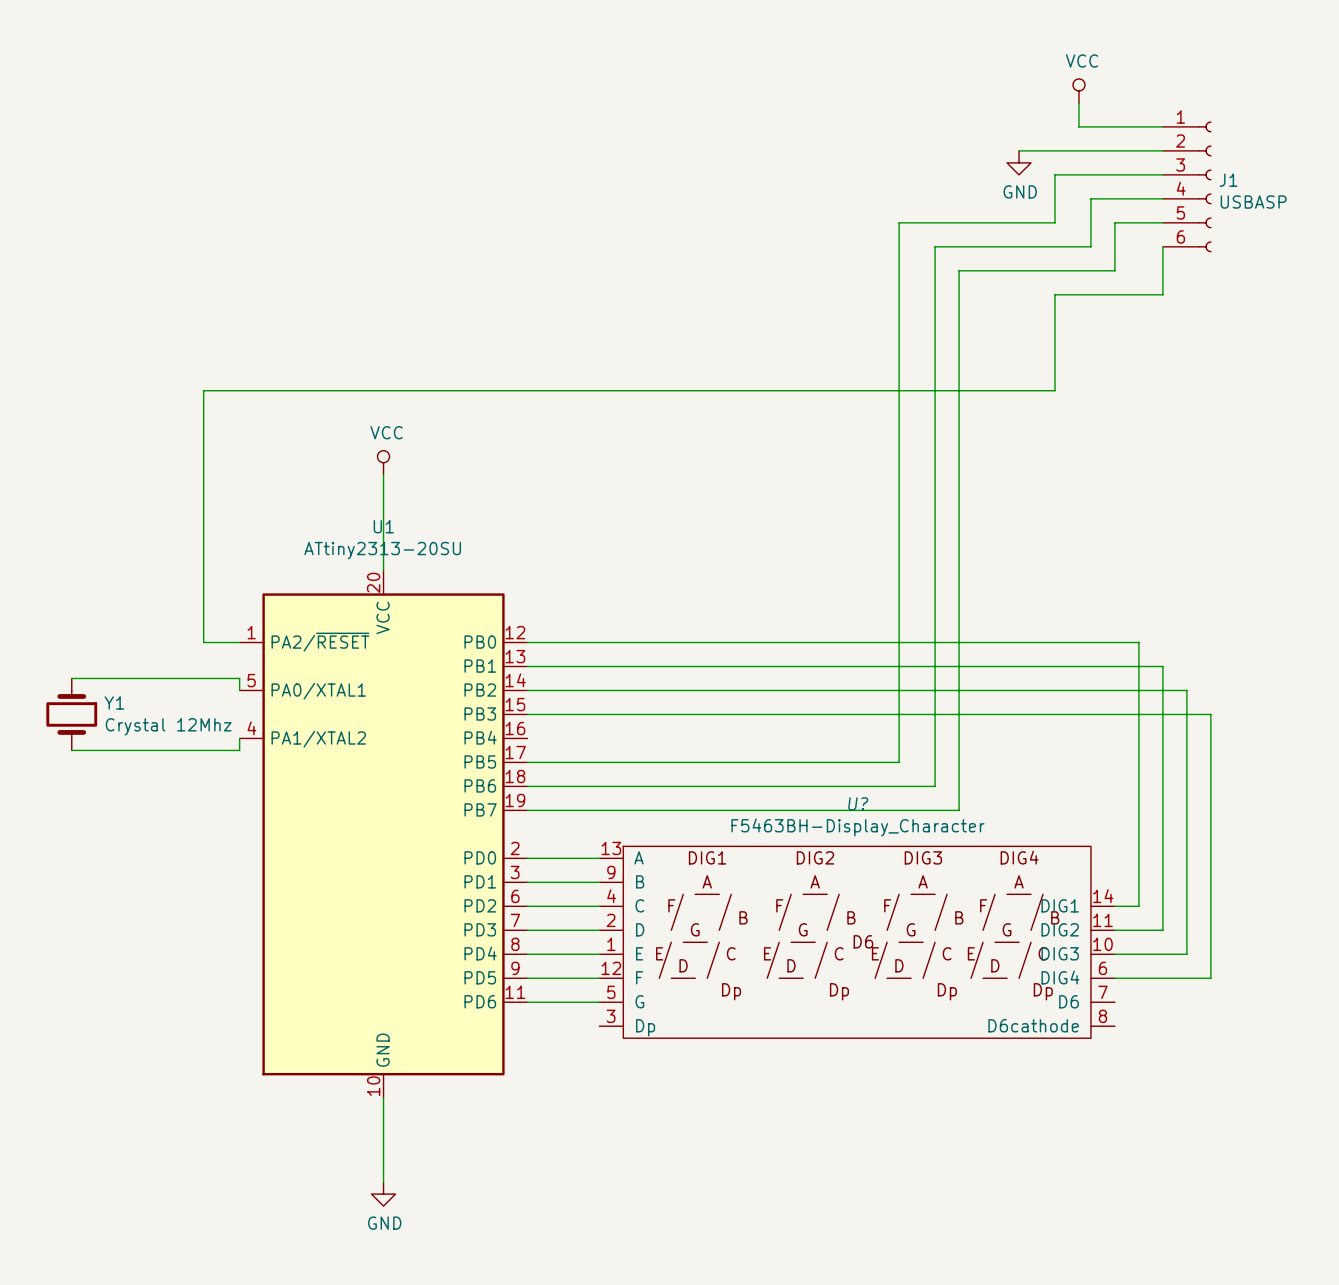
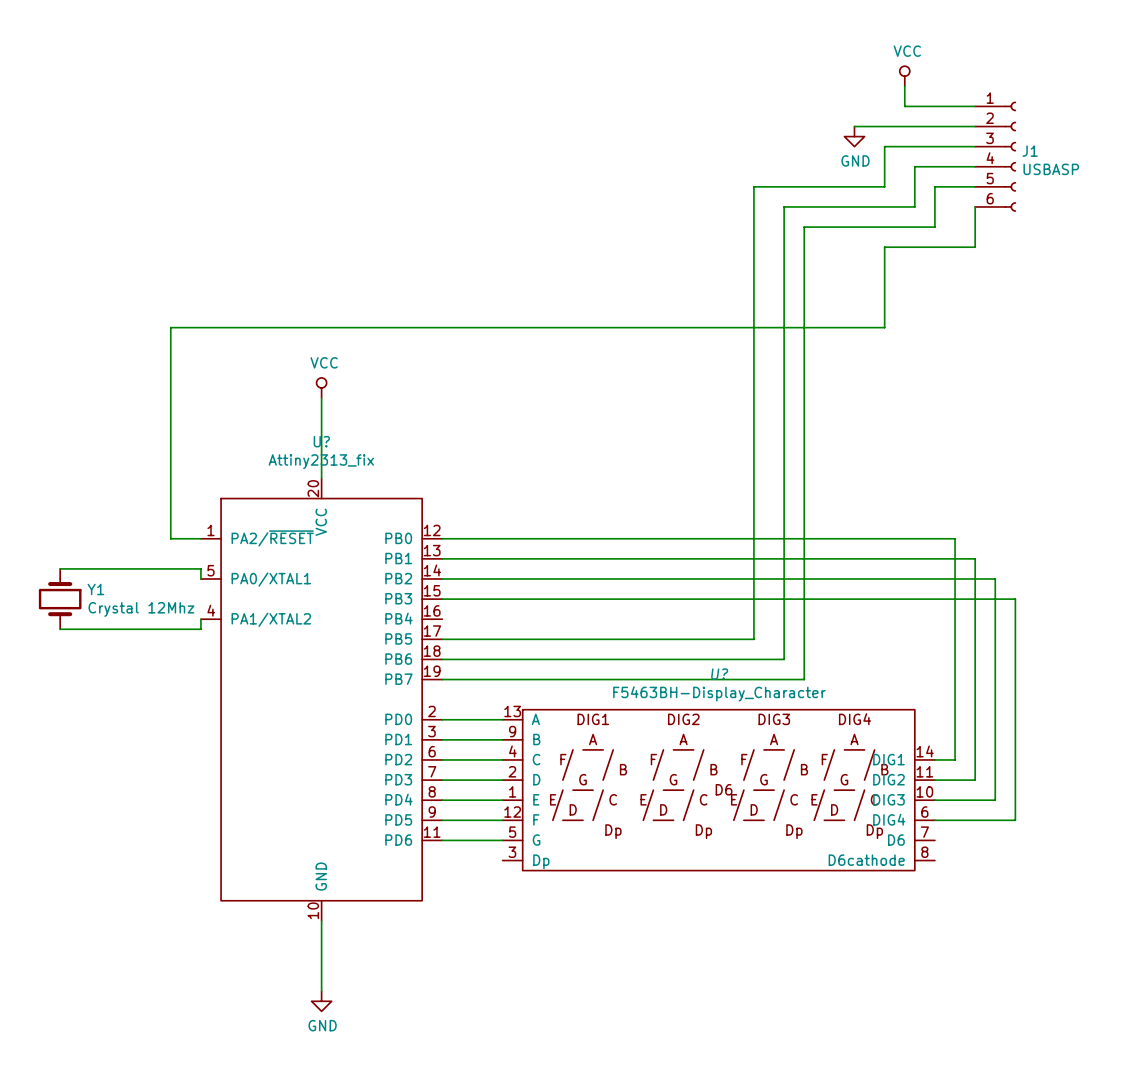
U1: ATtiny2313-20SU (383, 834) -> none
U?: none -> Attiny2313_fix (321, 699)

